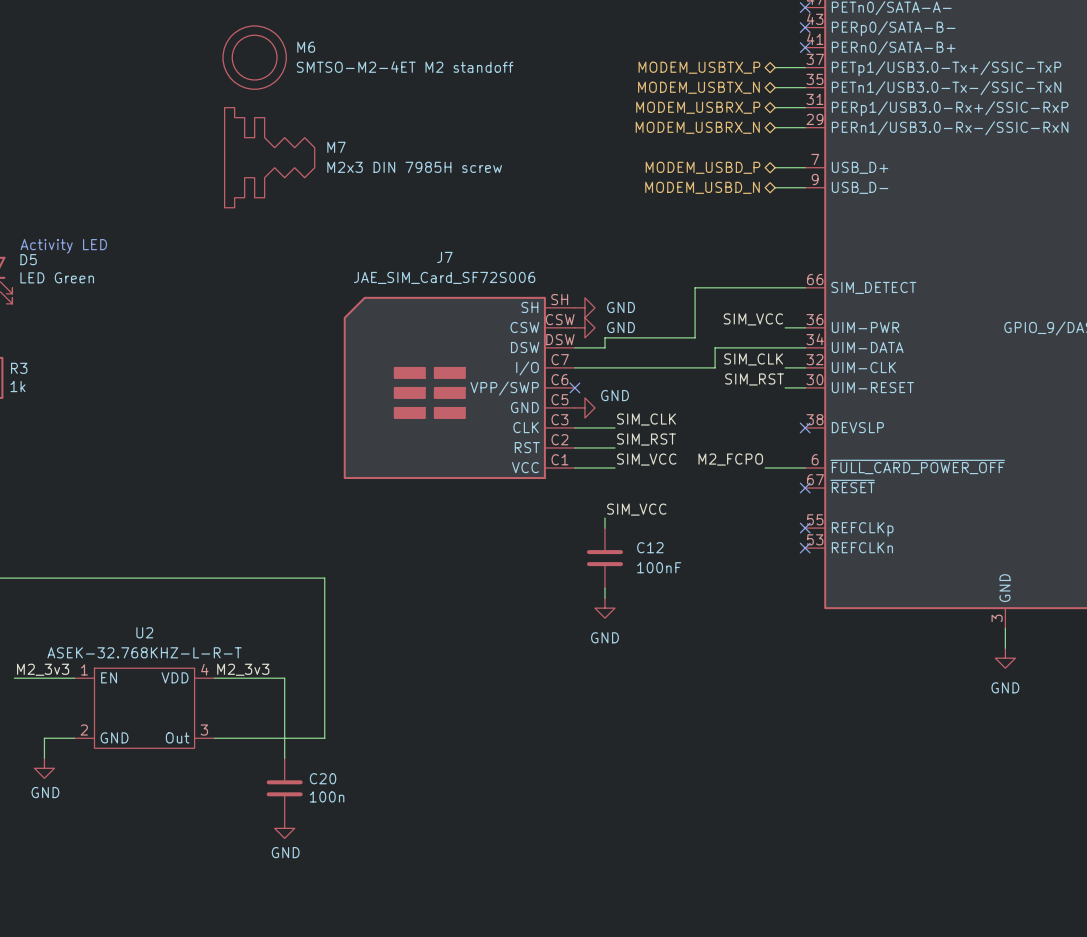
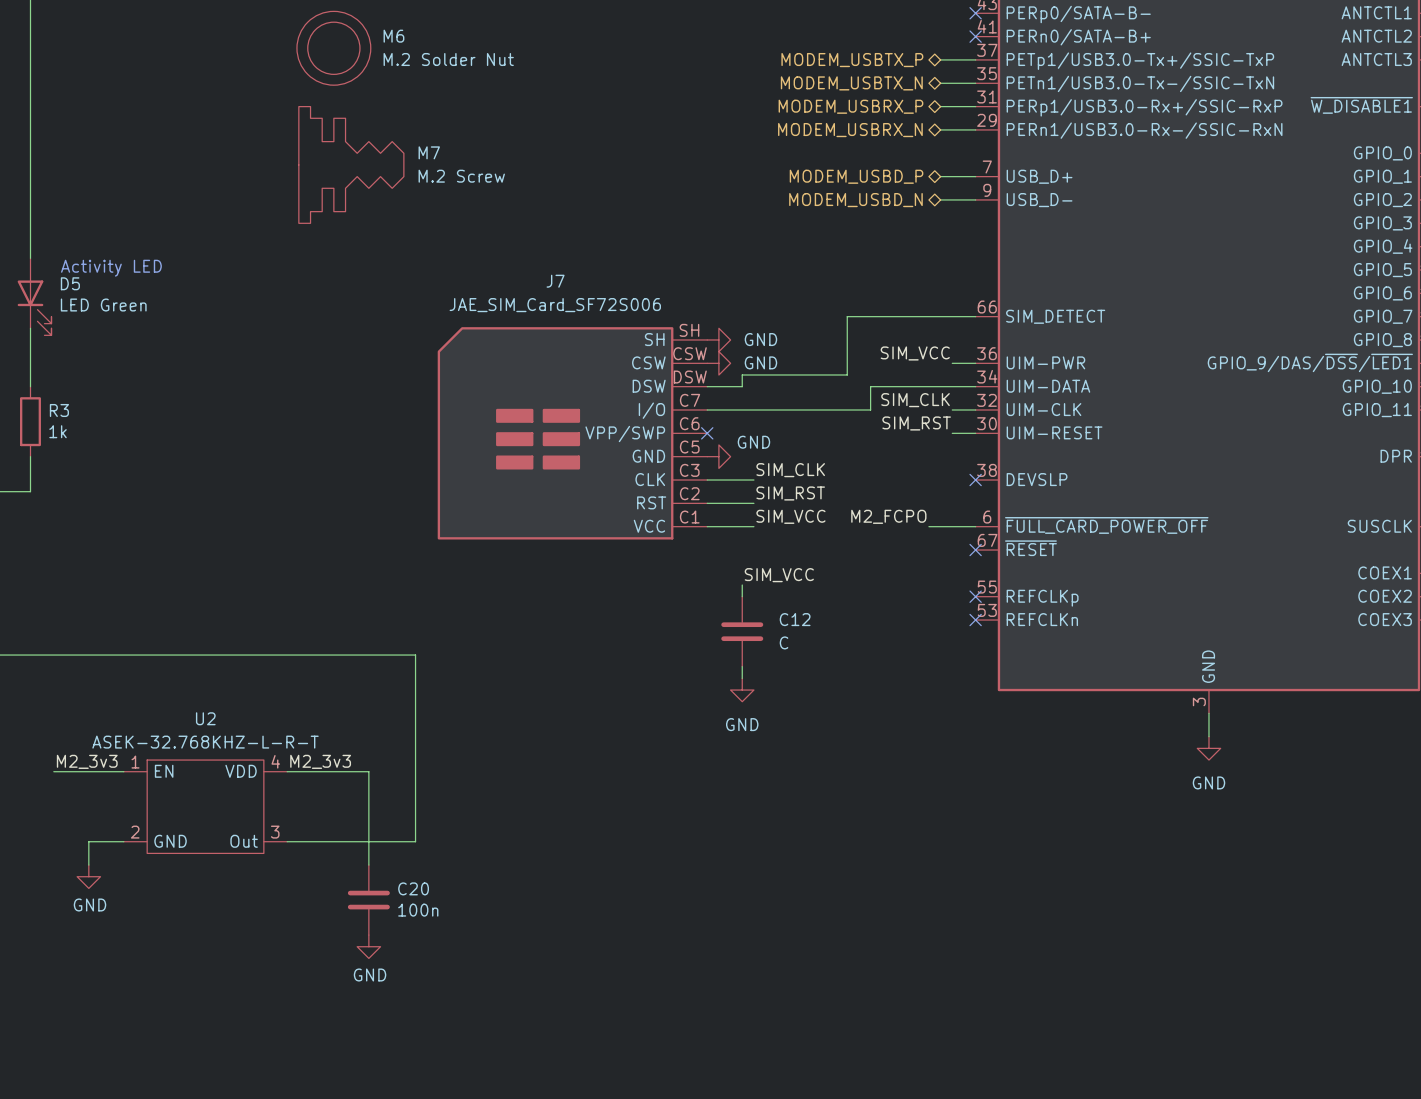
M6 value: SMTSO-M2-4ET M2 standoff (405, 67) -> M.2 Solder Nut (448, 59)
M7 value: M2x3 DIN 7985H screw (414, 167) -> M.2 Screw (461, 176)
C12 value: 100nF (659, 567) -> C (784, 642)

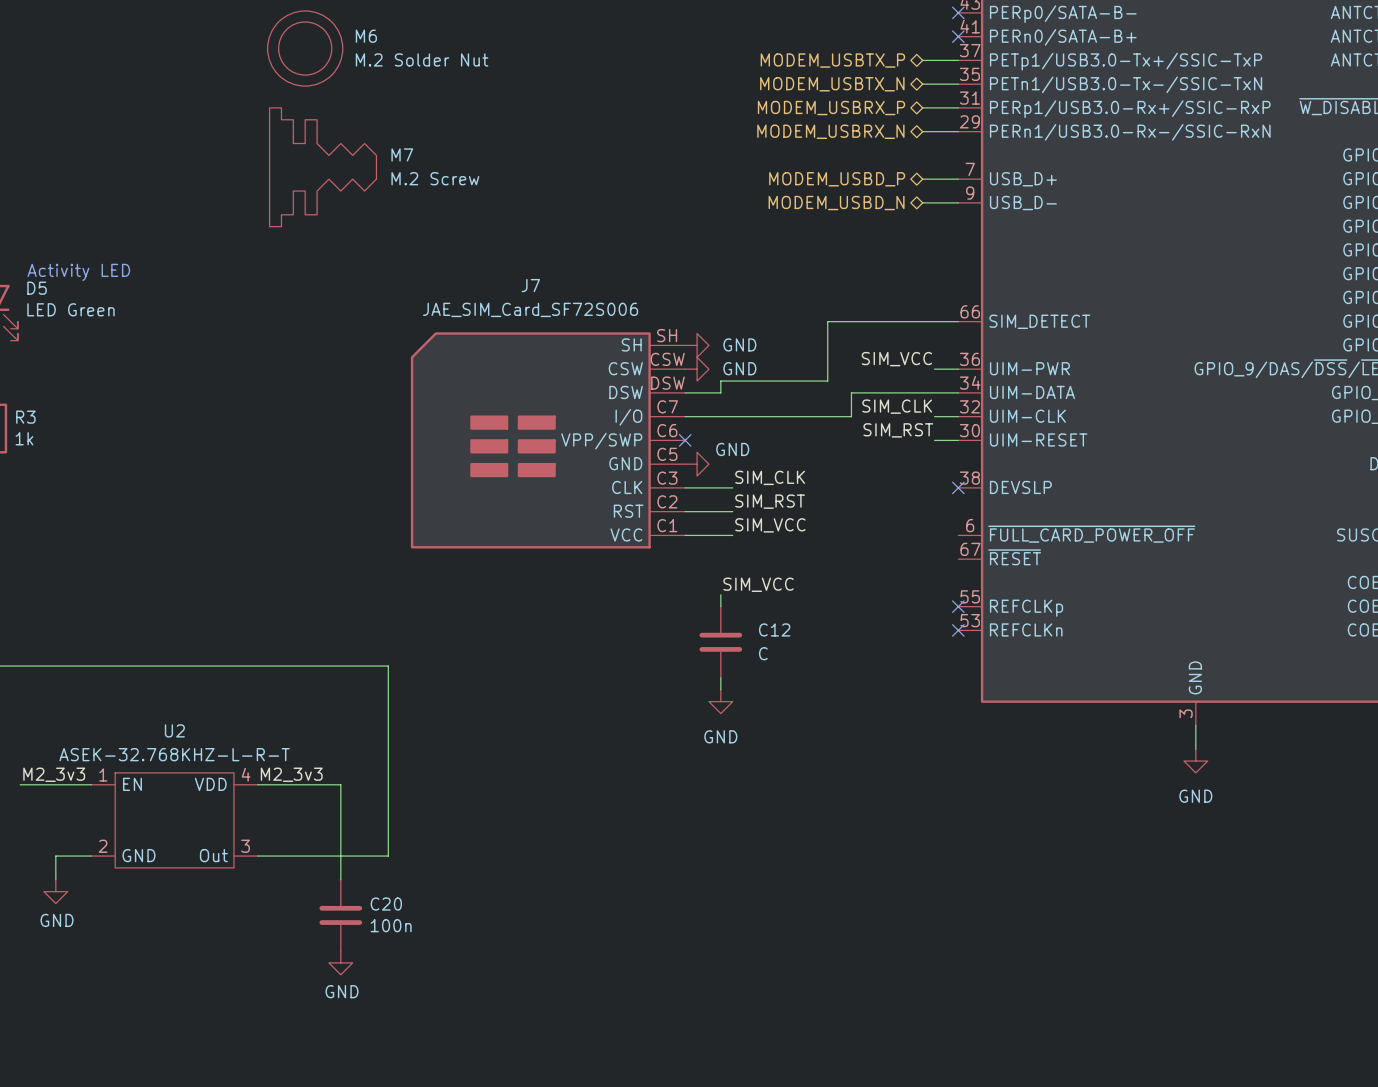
label: M2_FCPO (888, 516) -> none
wire: (928, 526) (975, 526) -> none
no-connect mark: (975, 550) -> none

